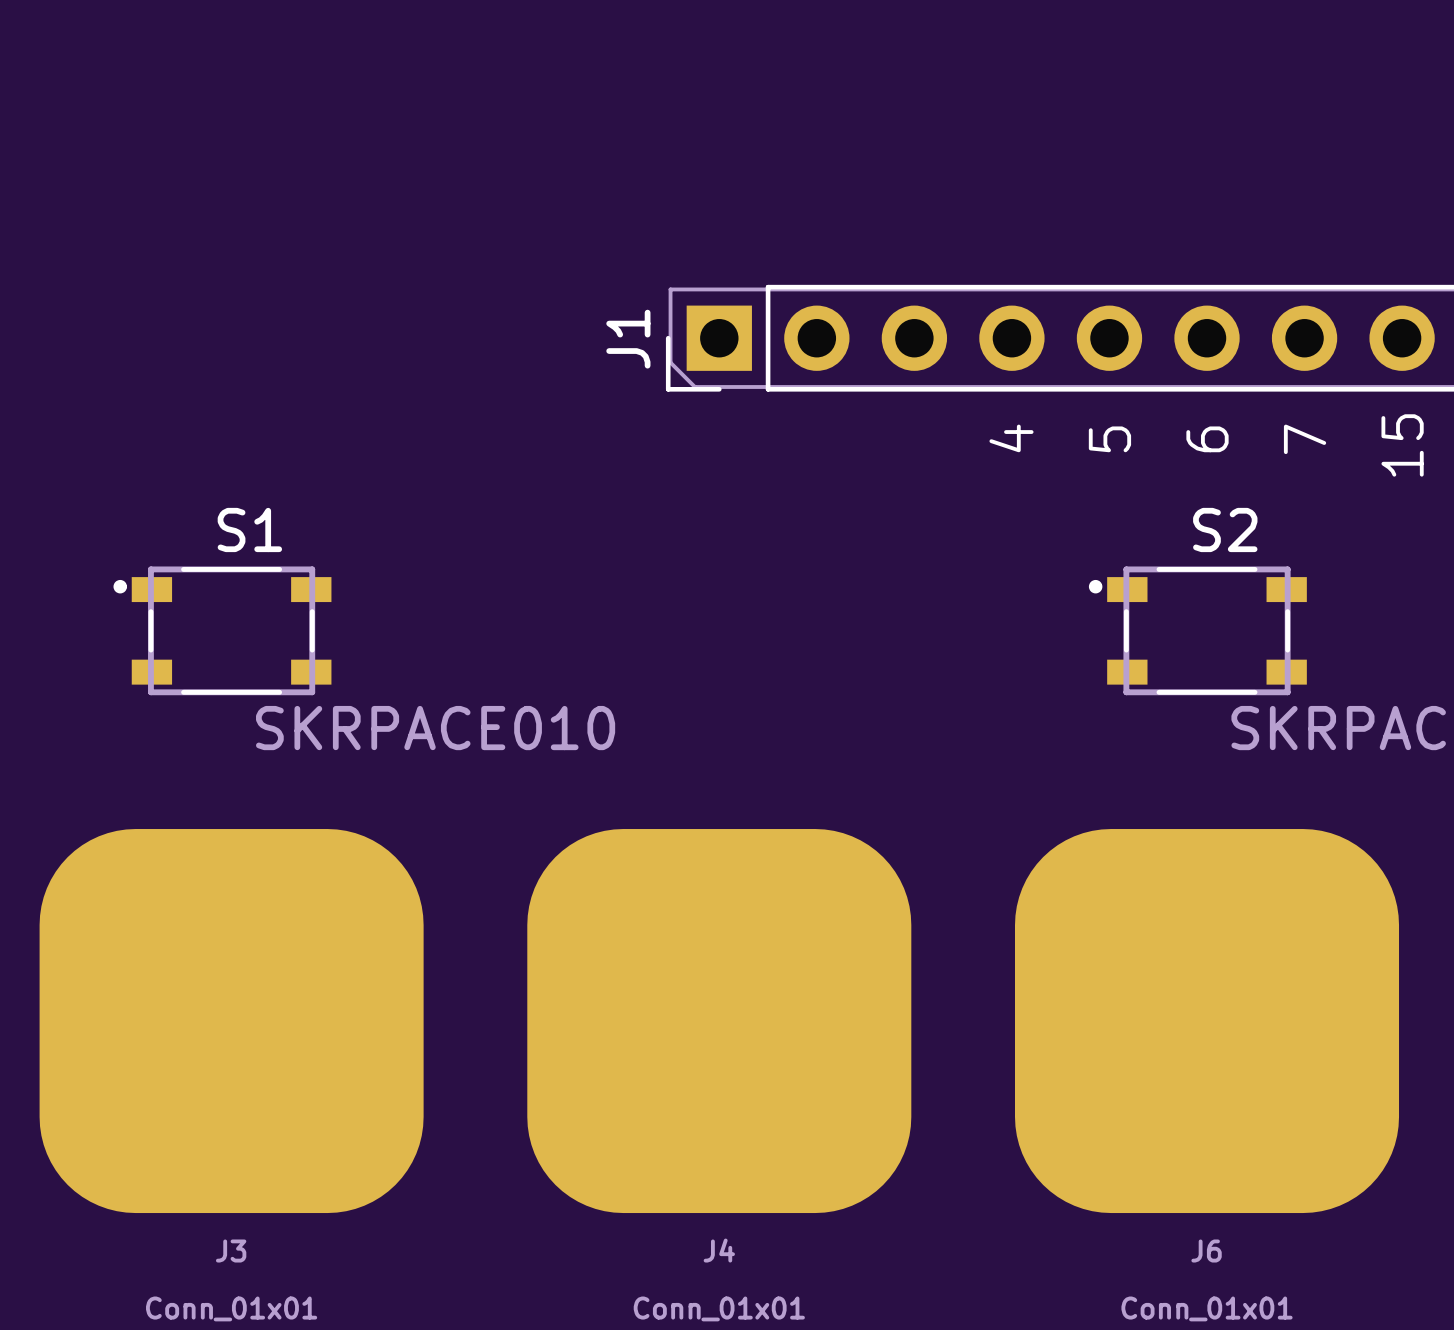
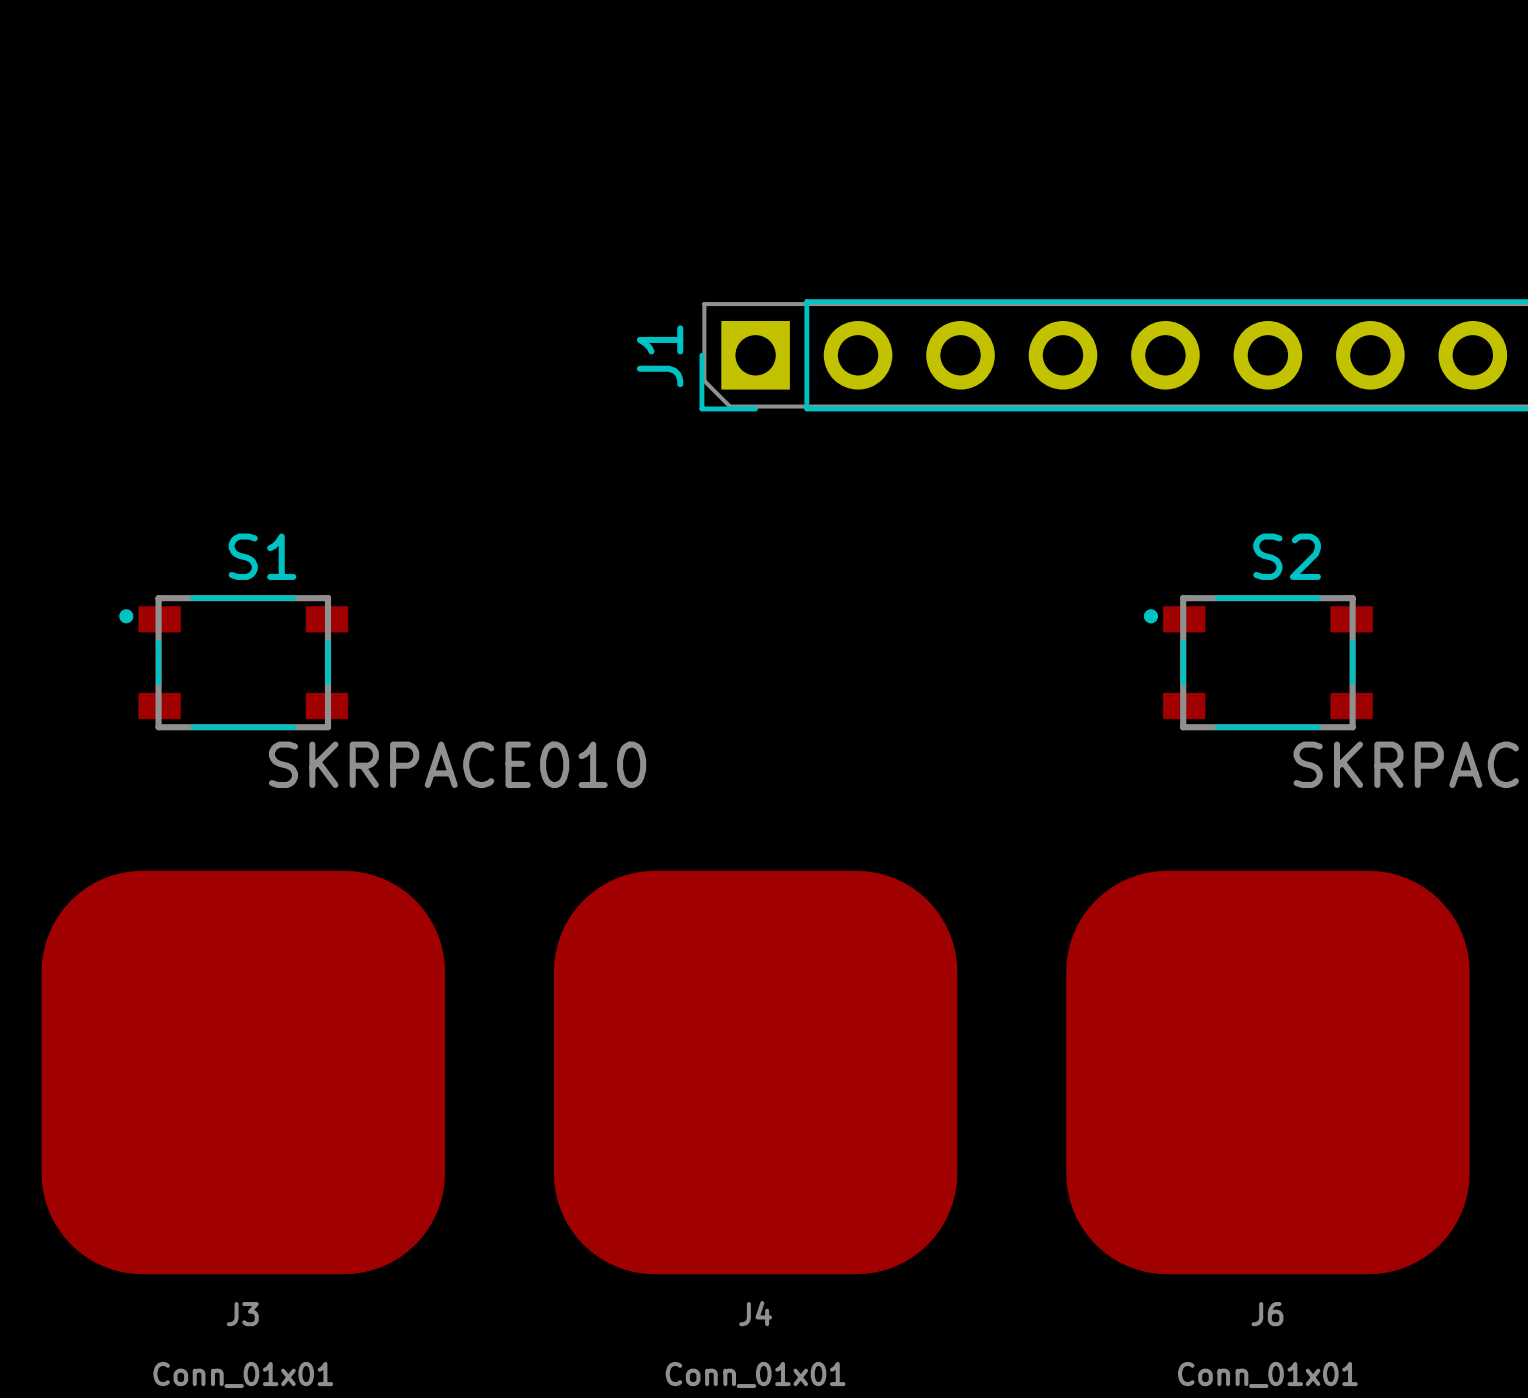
text: 4 (1011, 438) -> none
text: 5 (1109, 439) -> none
text: 6 (1207, 439) -> none
text: 7 (1305, 439) -> none
text: 15 (1402, 445) -> none

